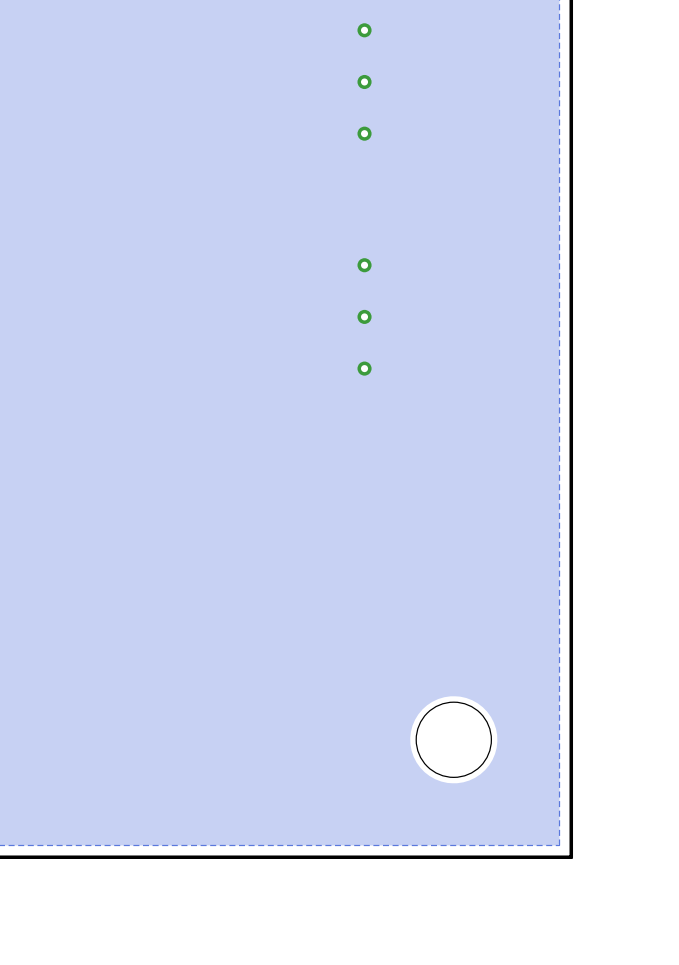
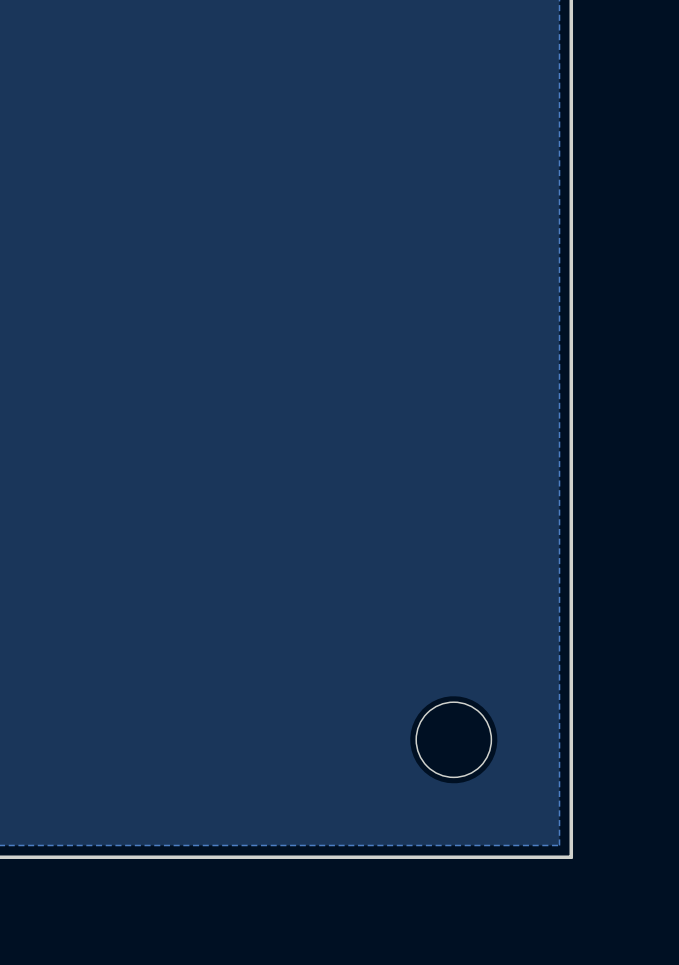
via: (364, 30) -> none
via: (364, 81) -> none
via: (364, 133) -> none
via: (364, 265) -> none
via: (364, 316) -> none
via: (364, 368) -> none

